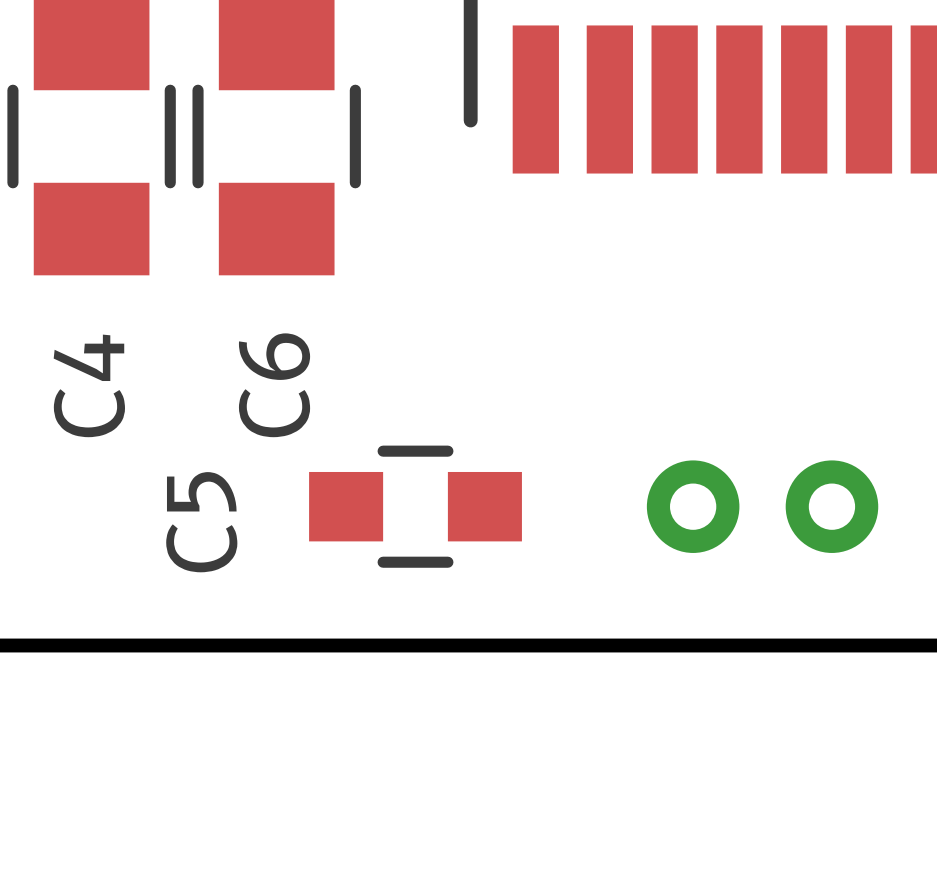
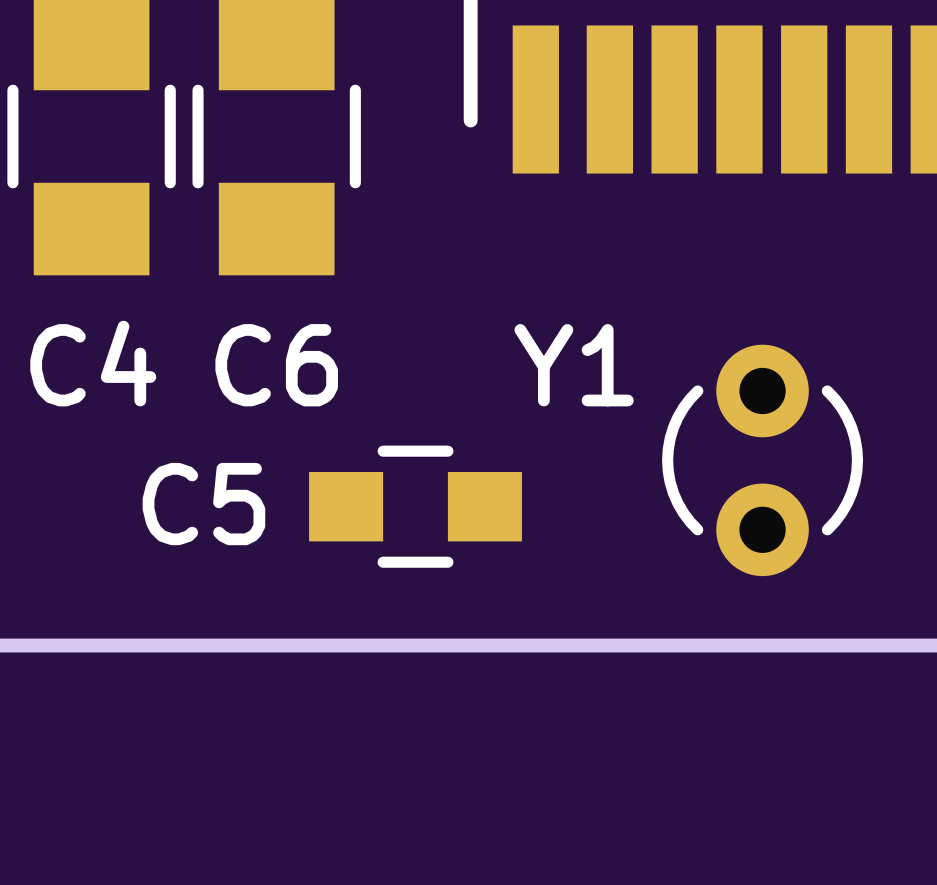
C4 name rotation: 0° (89, 385) -> 90° clockwise (93, 363)
C6 name rotation: 0° (274, 385) -> 90° clockwise (276, 365)
Y1 side: bottom (762, 506) -> top (762, 460)
C5 name rotation: 0° (201, 522) -> 90° clockwise (203, 504)

